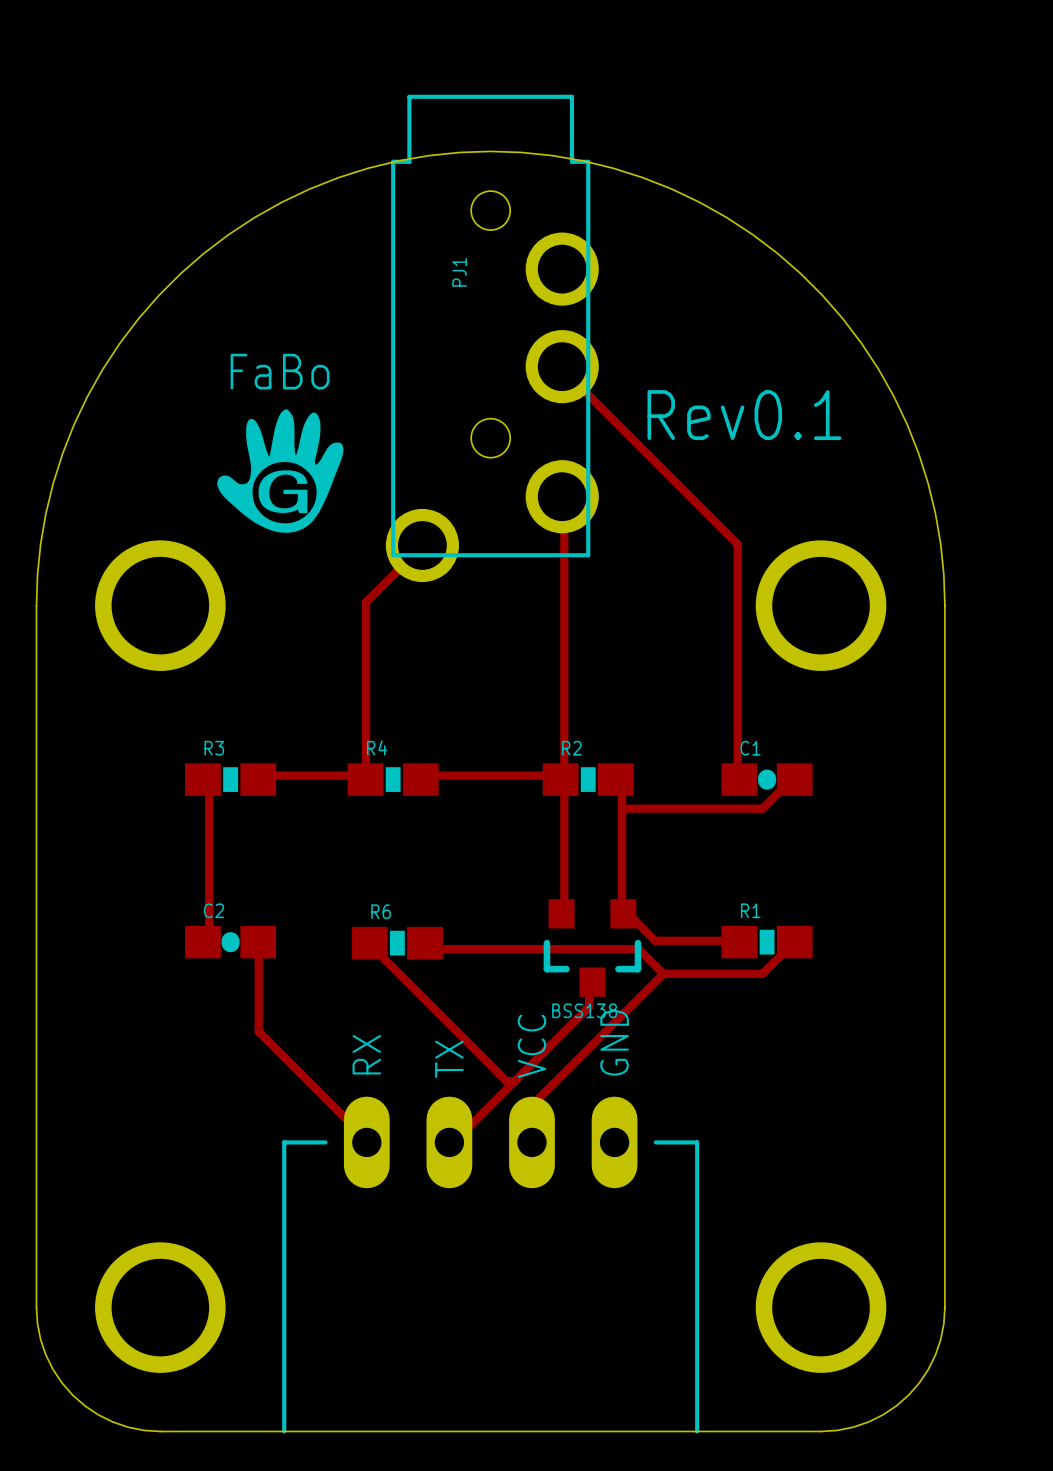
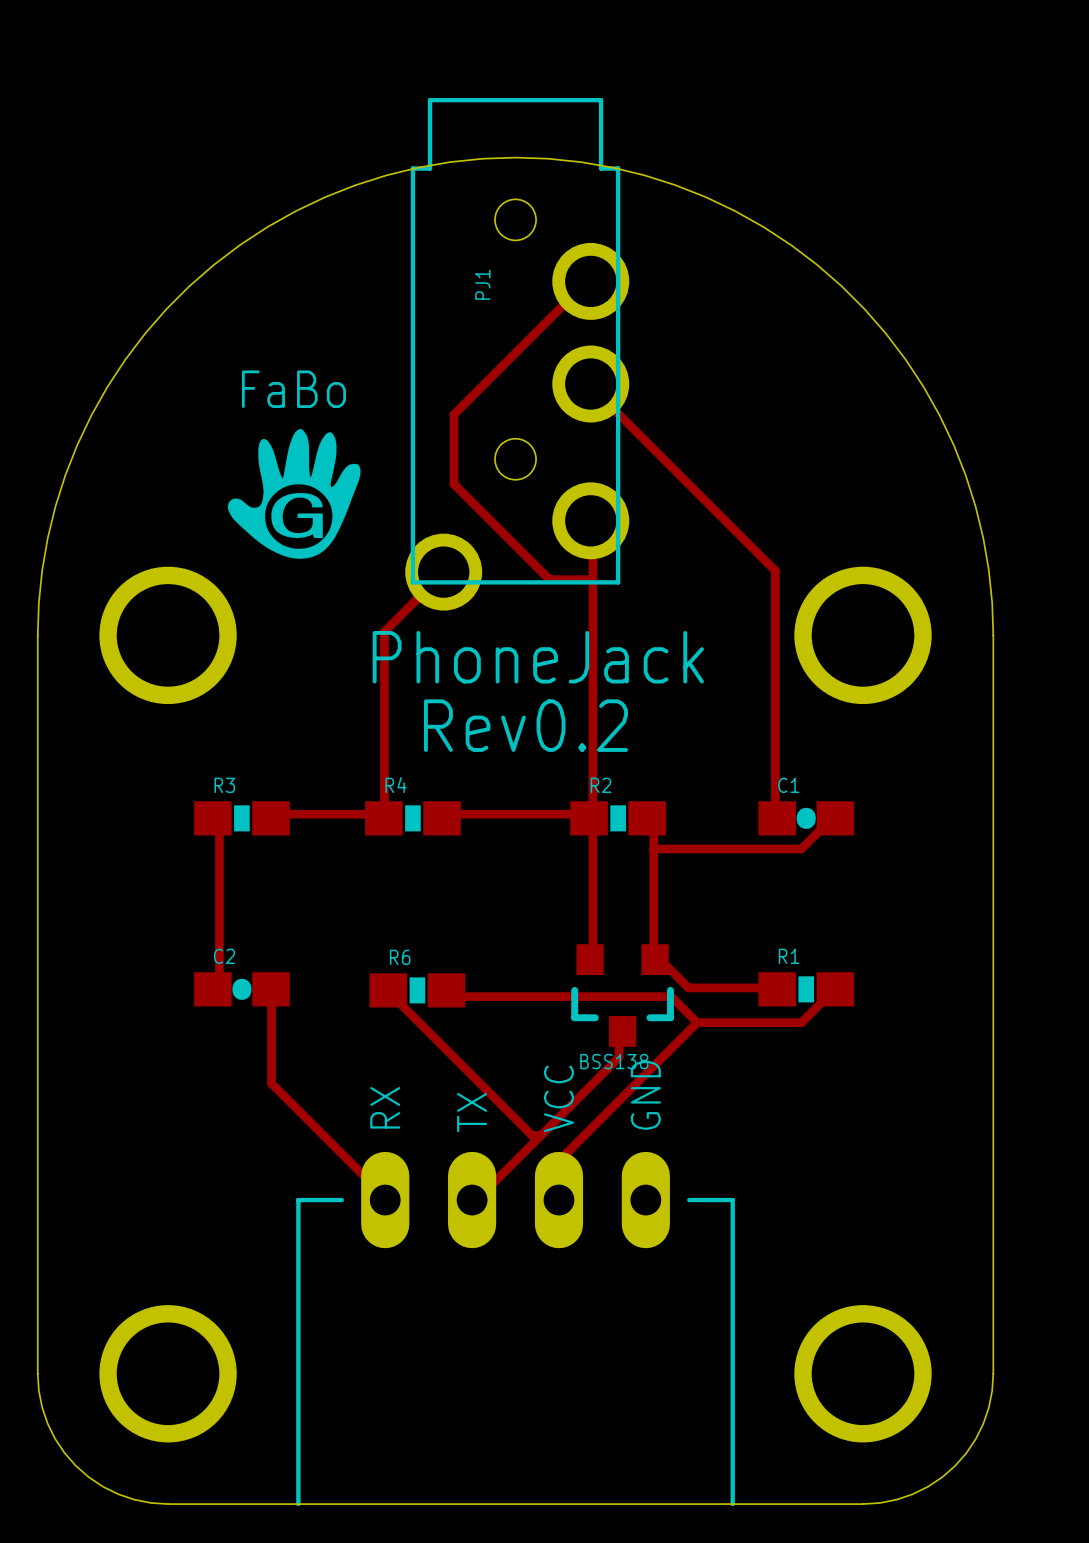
track: none -> (590, 281) (584, 284) (453, 414) (453, 484) (549, 579) (592, 579)
text: Rev0.1 (744, 415) -> none
text: none -> PhoneJack (538, 657)
text: none -> Rev0.2 (525, 725)

